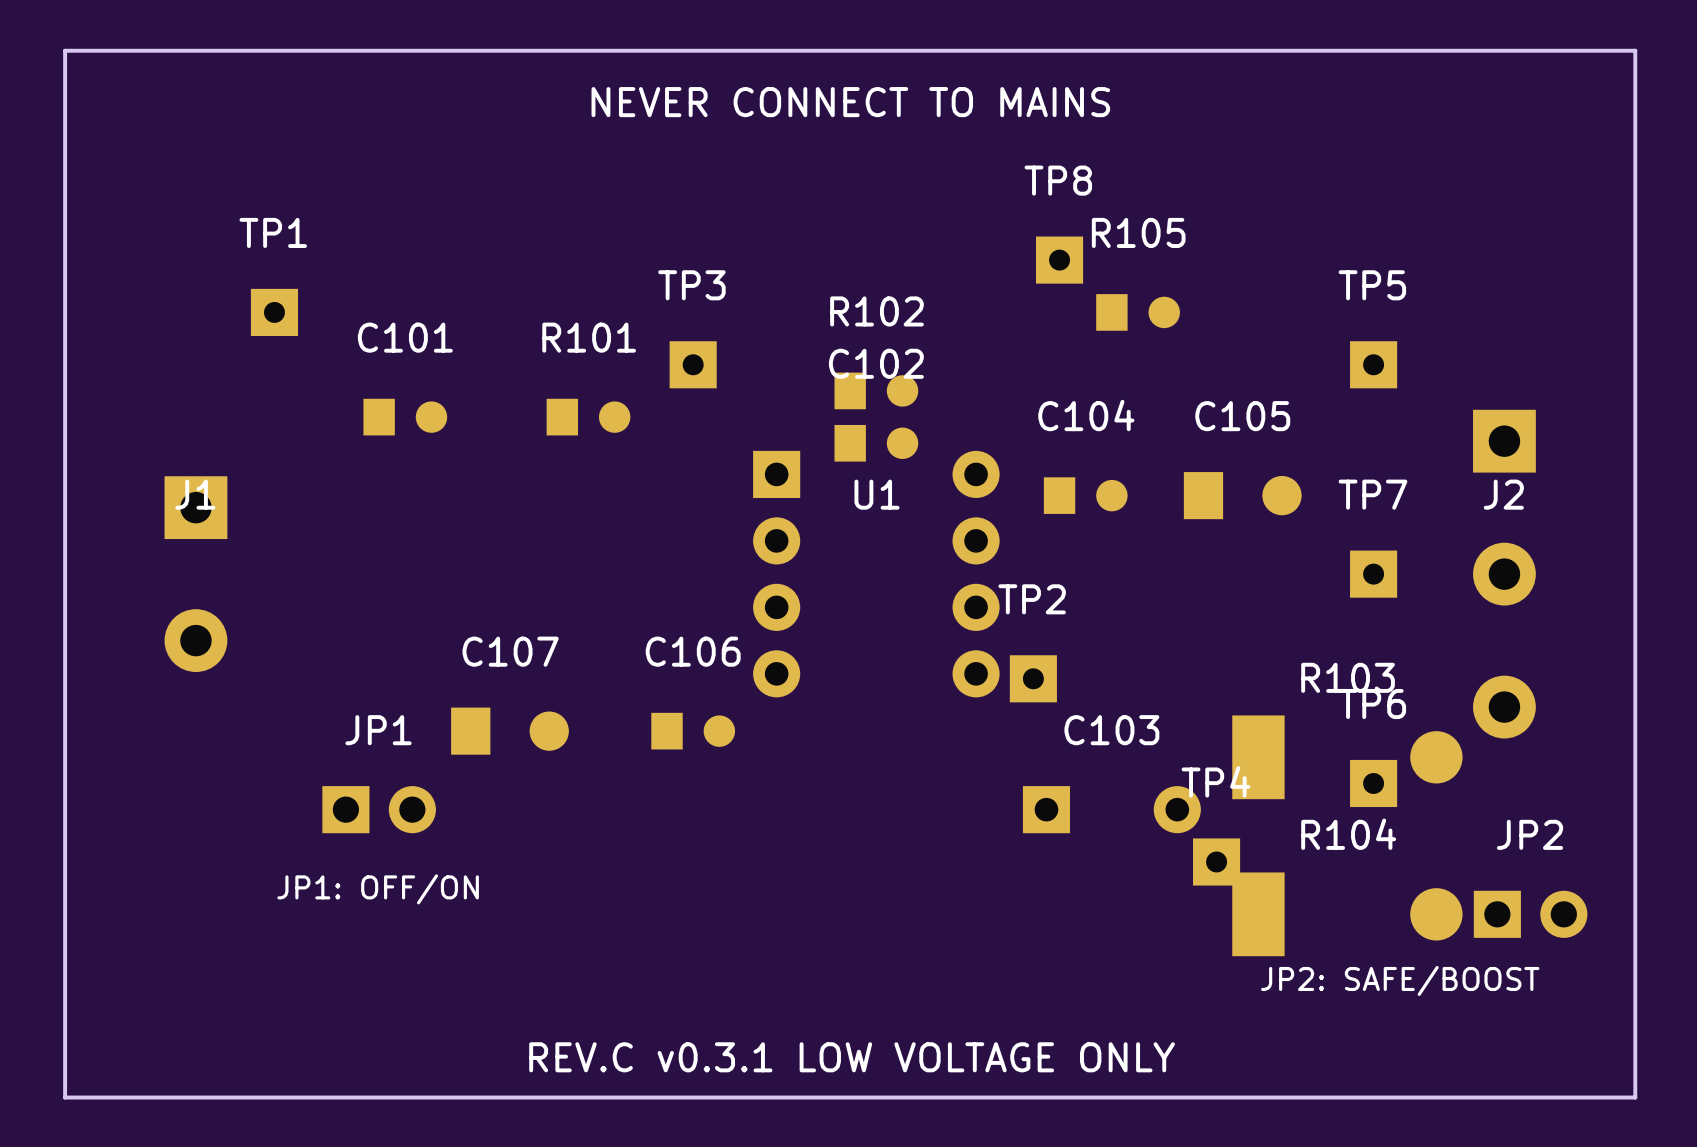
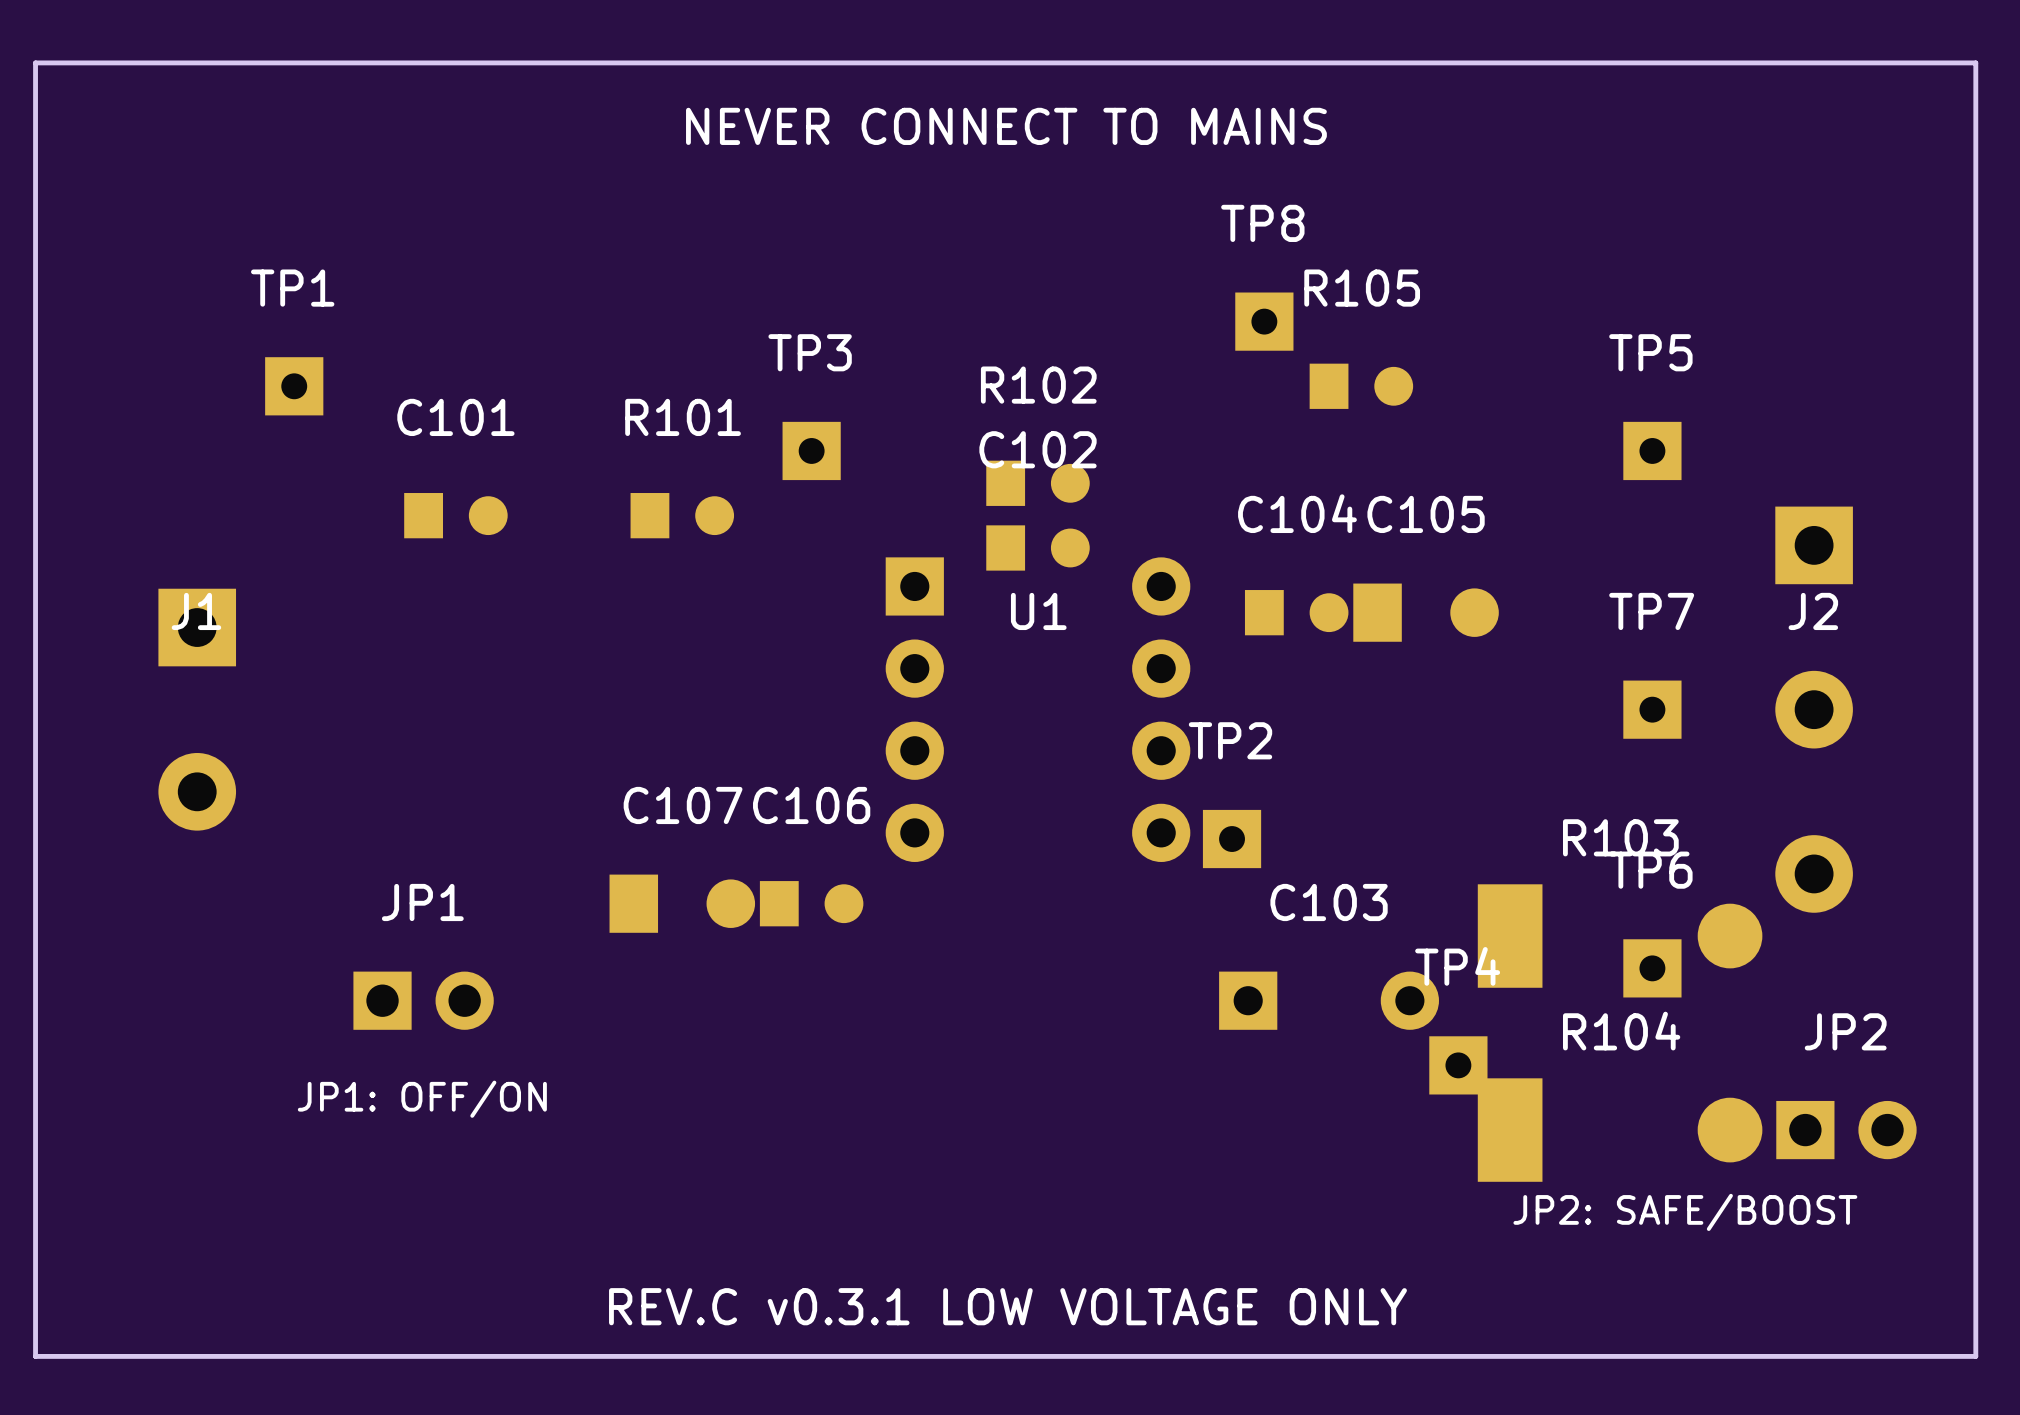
C105 position: (1242, 495) -> (1426, 612)
C107 position: (509, 731) -> (682, 903)

